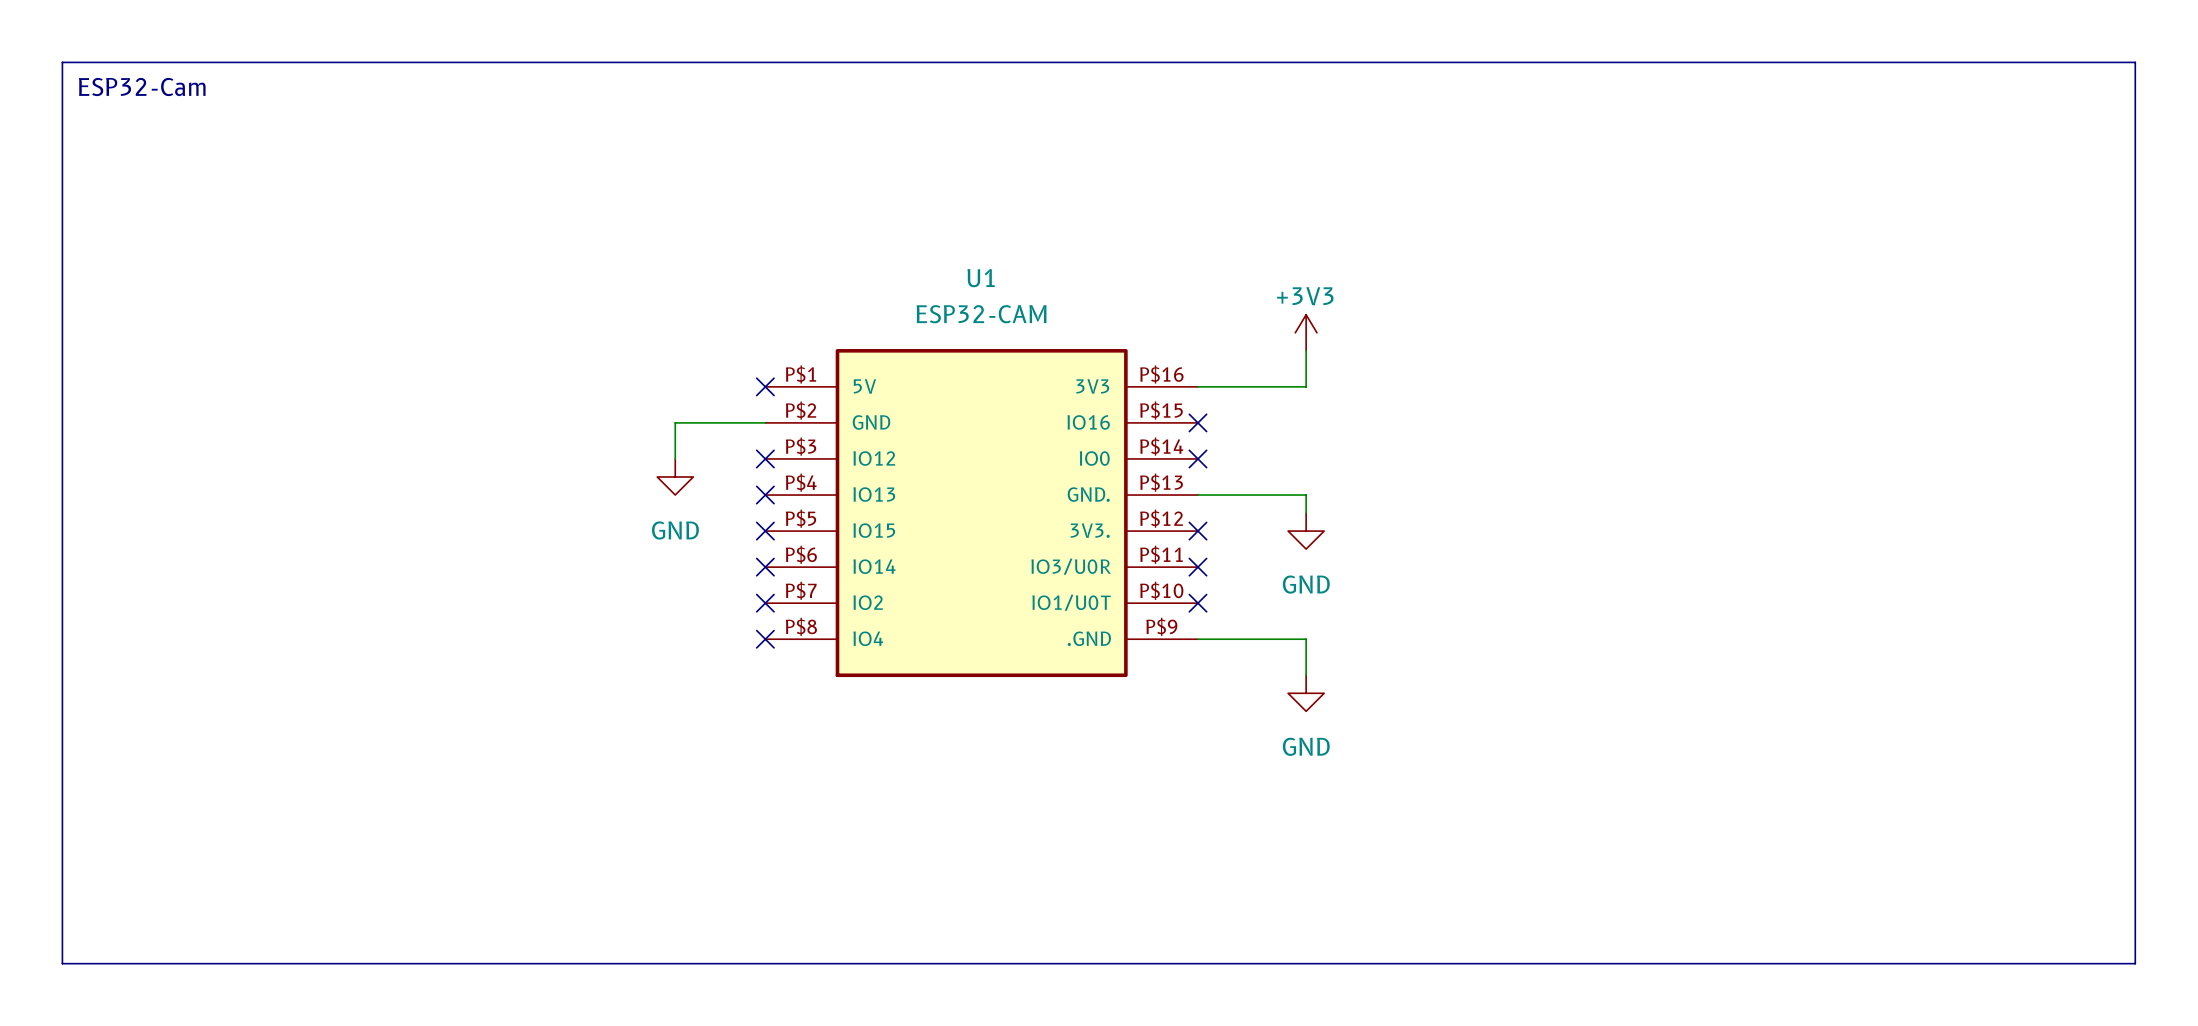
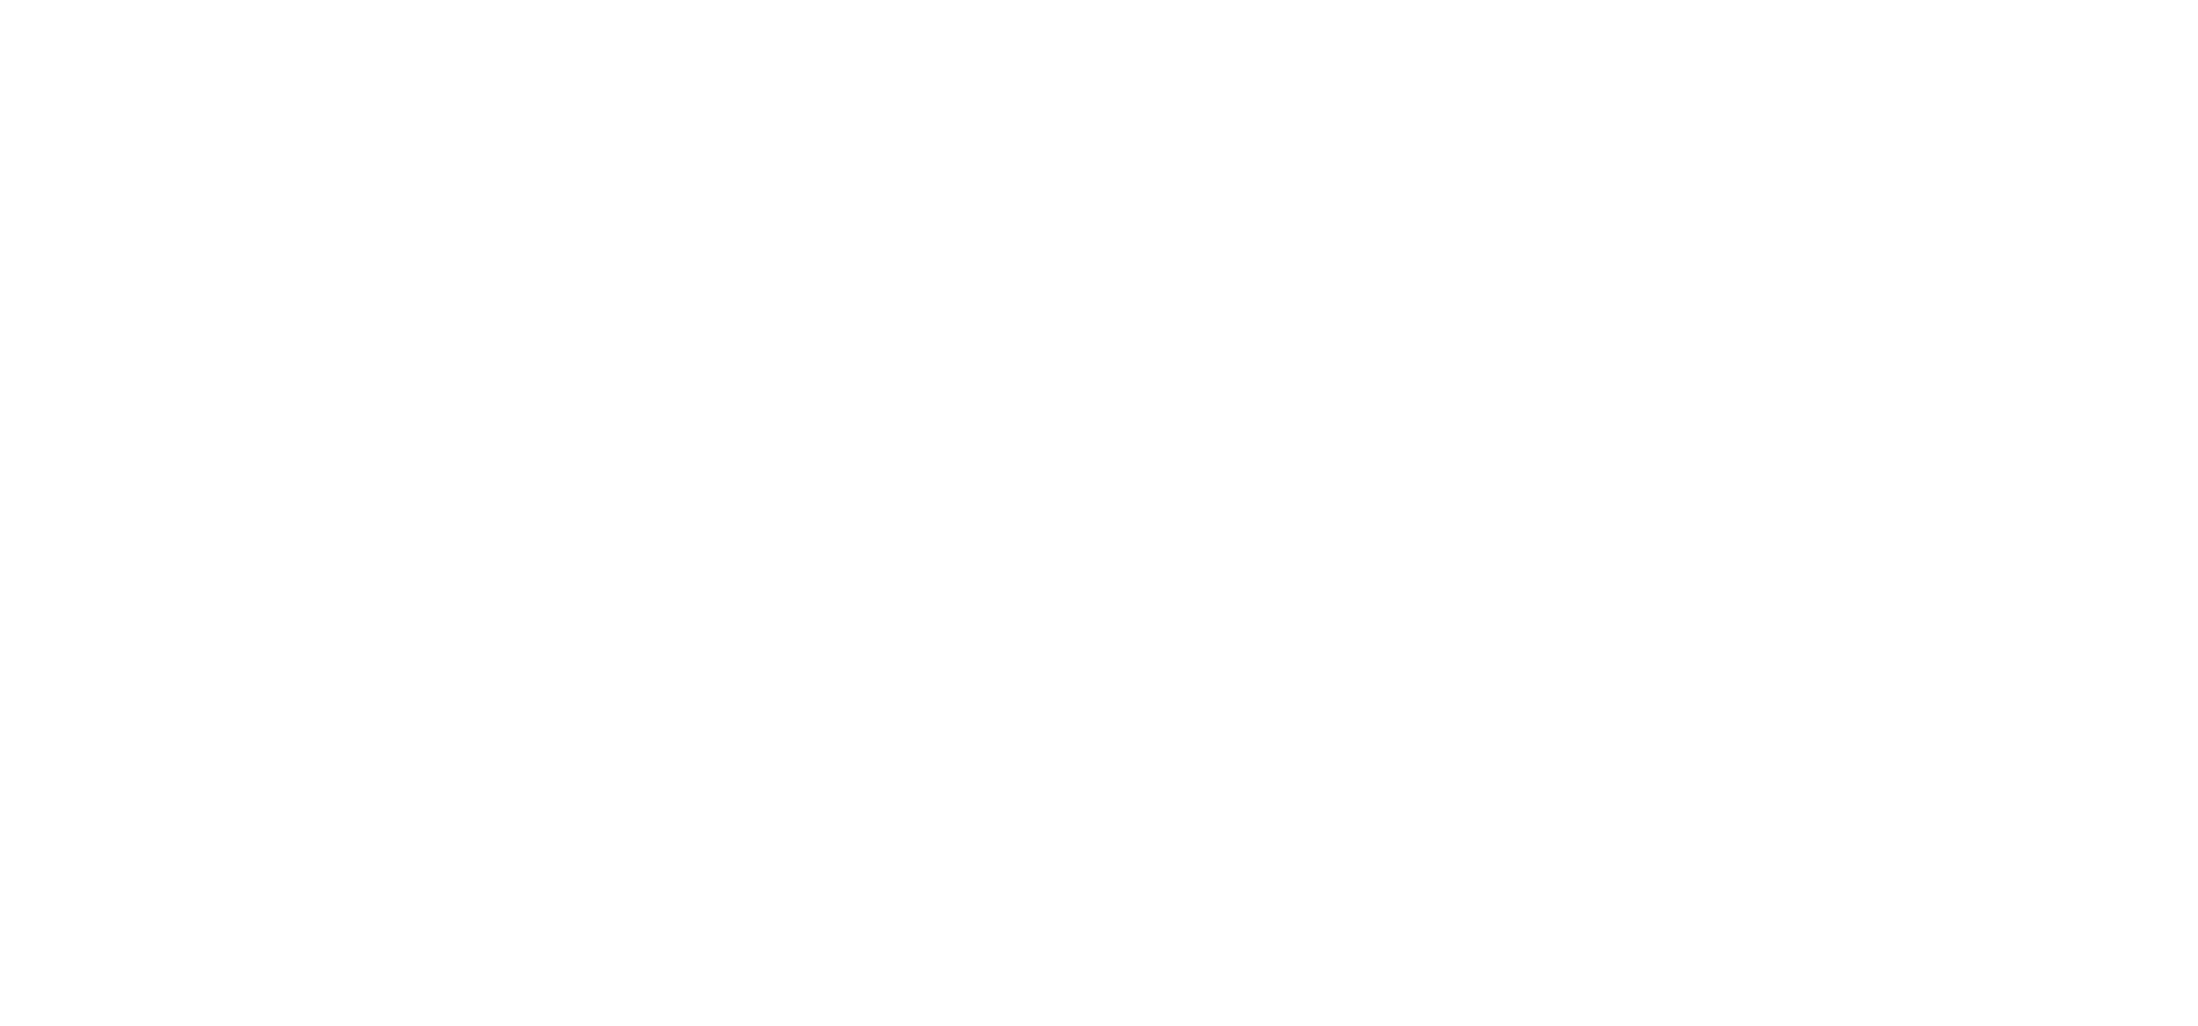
line: (62, 62) (2135, 62) (2135, 963) (62, 963) (62, 62) -> none
text: ESP32-Cam (142, 87) -> none
power symbol: +3V3 (1306, 332) -> none
wire: (1306, 350) (1306, 386) (1197, 386) -> none
no-connect mark: (765, 386) -> none
wire: (765, 422) (675, 422) (675, 458) -> none
no-connect mark: (1197, 422) -> none
no-connect mark: (765, 458) -> none
no-connect mark: (1197, 458) -> none
power symbol: GND (675, 476) -> none
no-connect mark: (765, 495) -> none
wire: (1197, 495) (1306, 495) (1306, 513) -> none
U1: ESP32-CAM (981, 513) -> none
no-connect mark: (765, 531) -> none
no-connect mark: (1197, 531) -> none
power symbol: GND (1306, 531) -> none
no-connect mark: (765, 567) -> none
no-connect mark: (1197, 567) -> none
no-connect mark: (765, 603) -> none
no-connect mark: (1197, 603) -> none
no-connect mark: (765, 639) -> none
wire: (1197, 639) (1306, 639) (1306, 675) -> none
power symbol: GND (1306, 693) -> none

